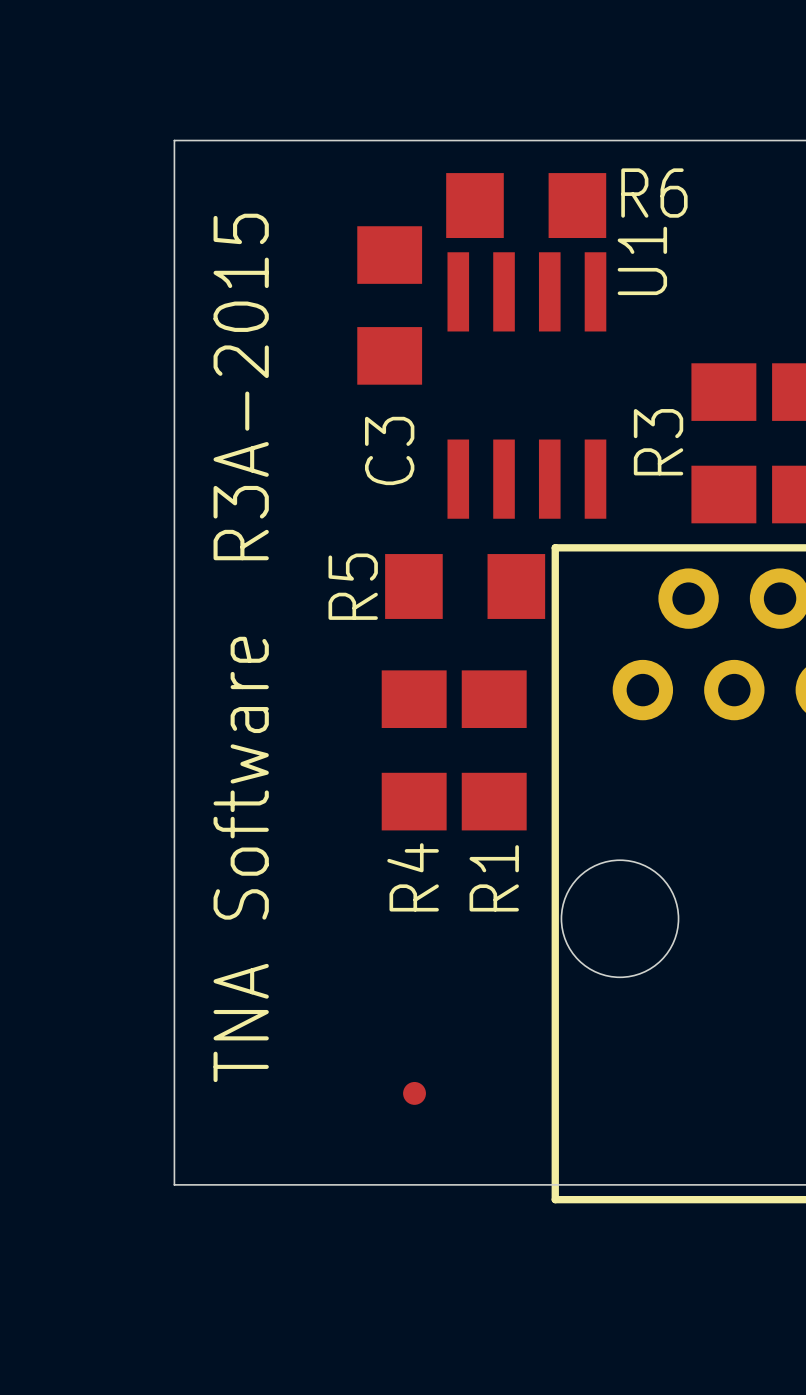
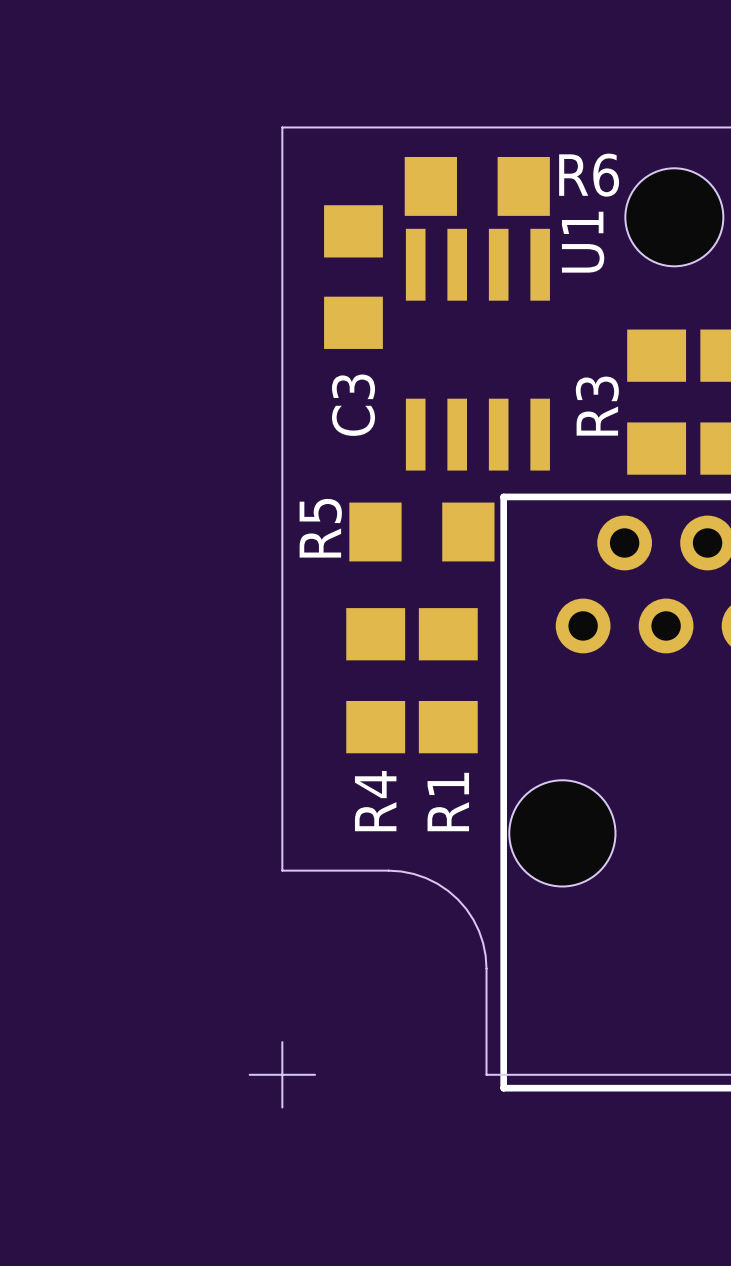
board edge: (311, 140) (174, 140) (174, 1184) (275, 1184) -> (282, 127) (282, 870) (401, 871) (413, 873) (437, 883) (457, 899) (473, 919) (483, 943) (485, 955) (486, 1074)
hole: none -> (674, 217)
text: R3A-2015 (241, 386) -> none
text: TNA Software (241, 859) -> none
part: (414, 1093) -> none
board edge: none -> (282, 1042) (282, 1107)
board edge: (347, 1184) (536, 1184) -> none

